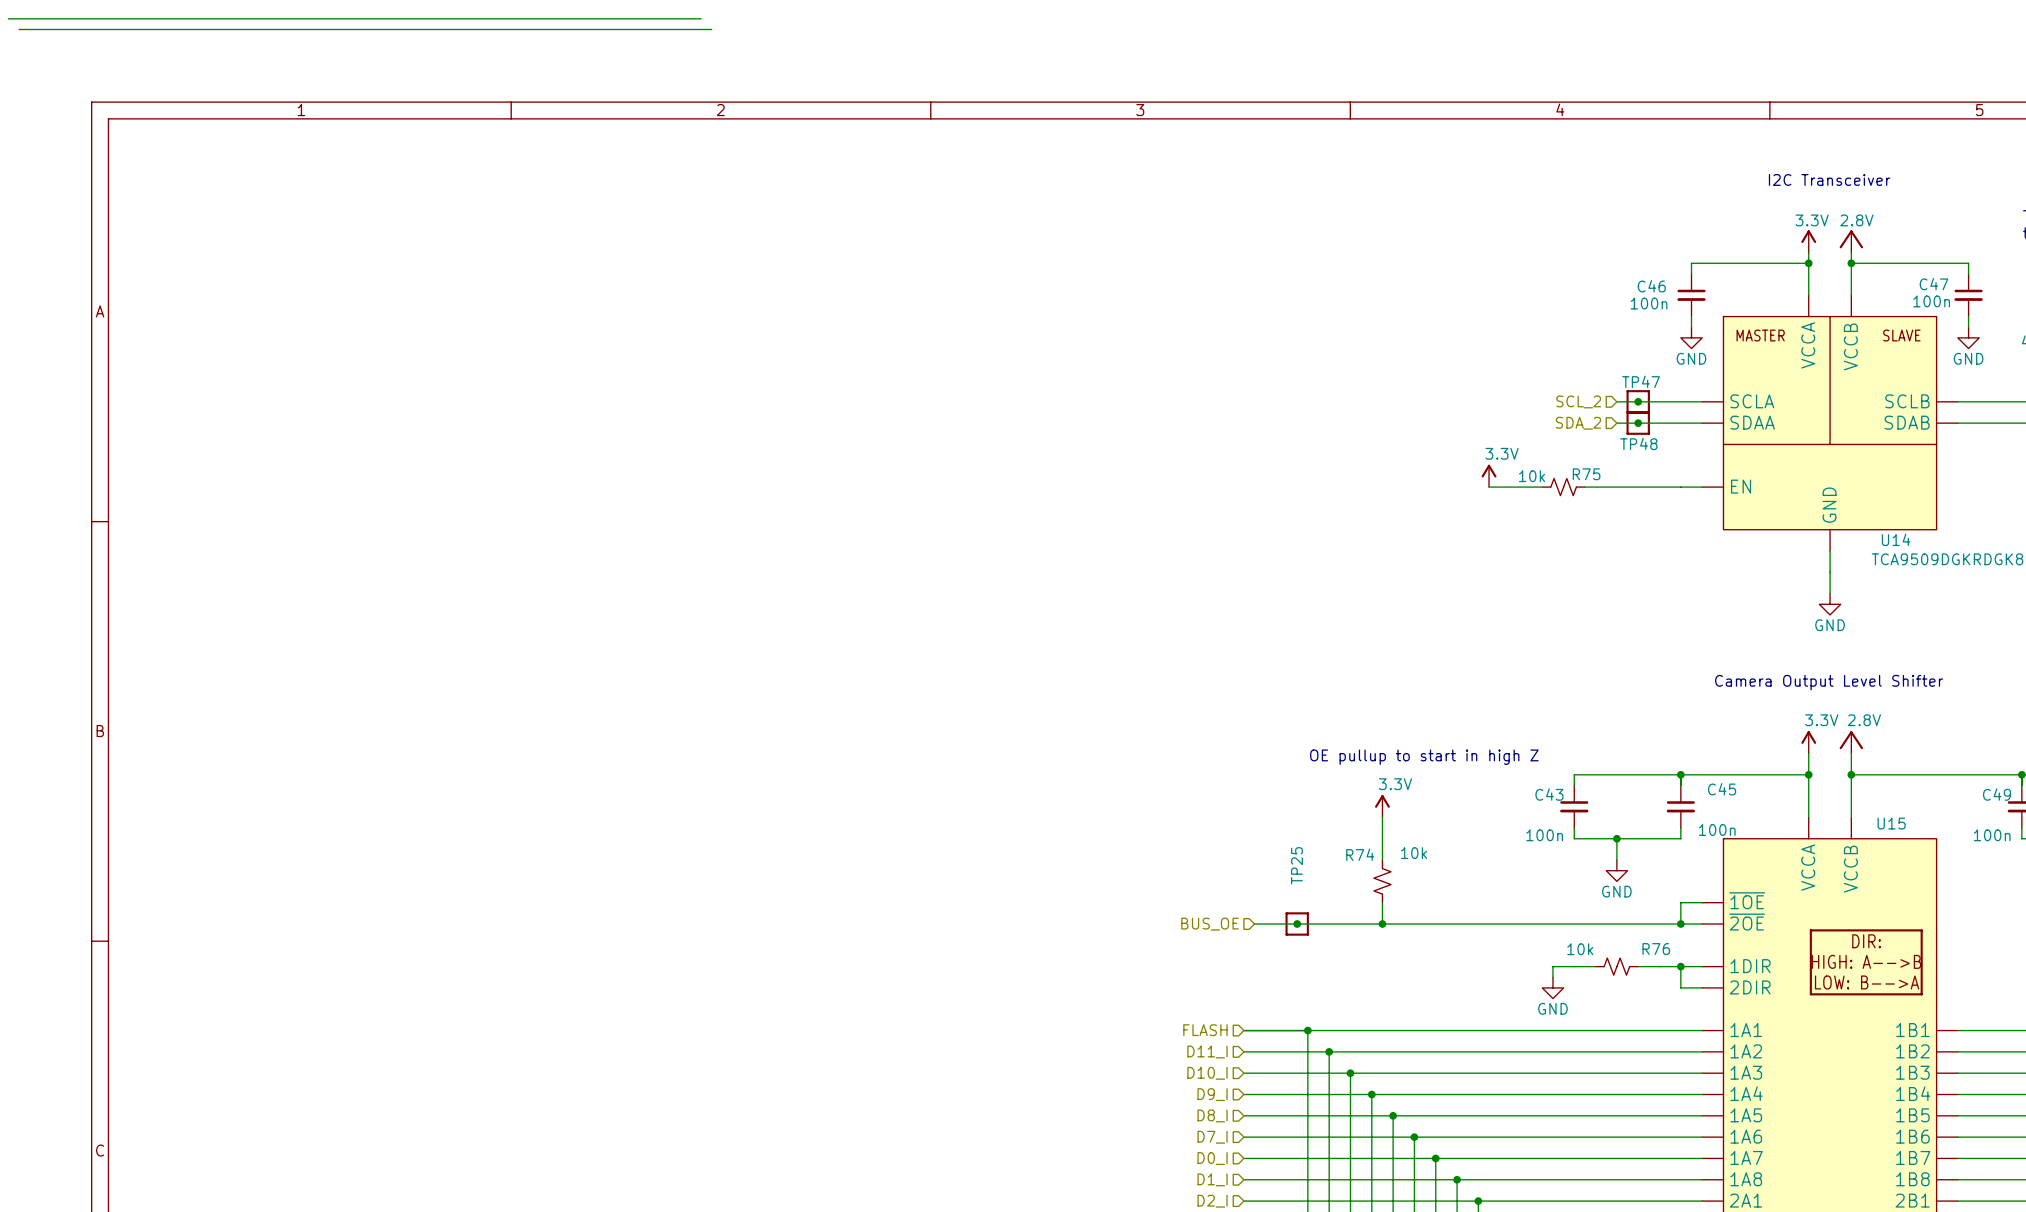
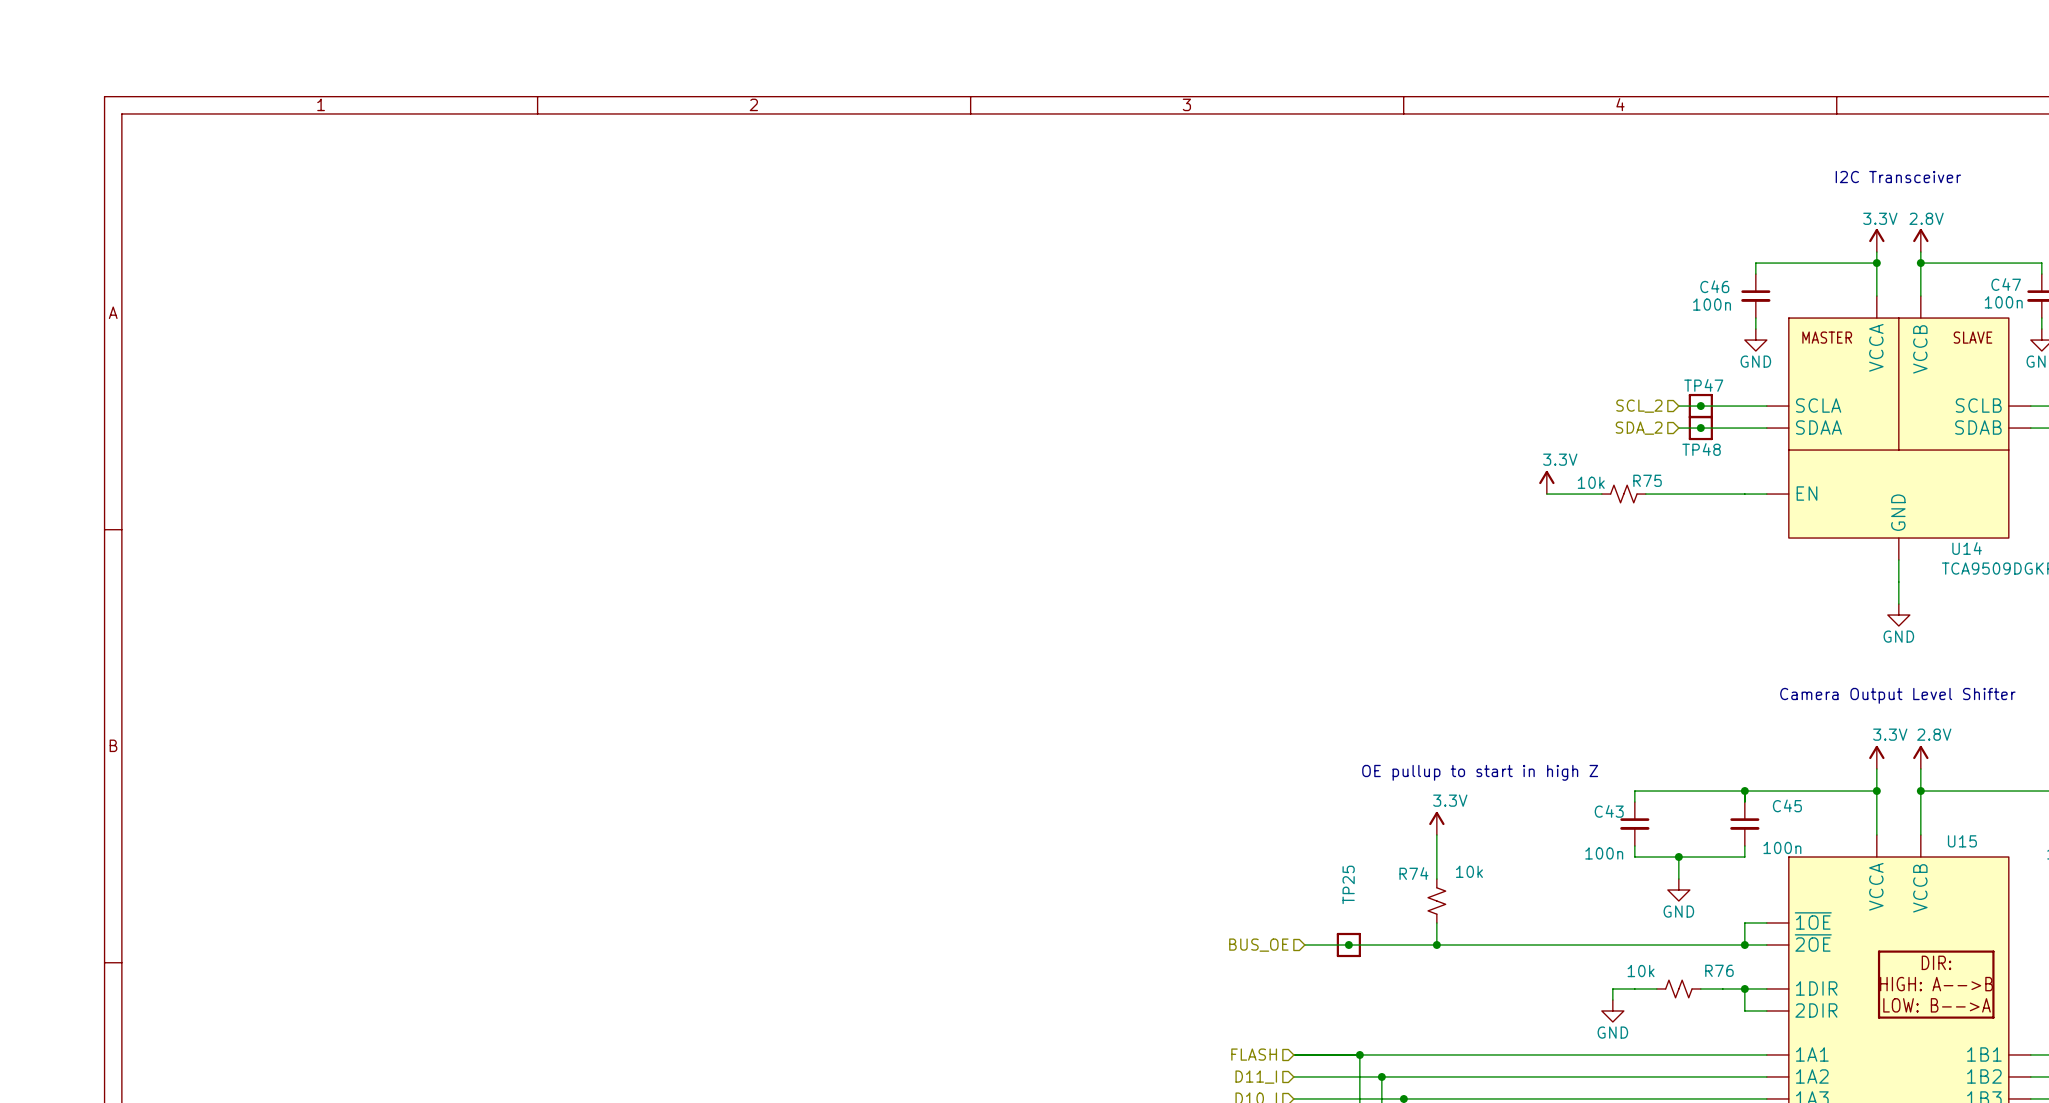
wire: (8, 18) (701, 18) -> none
wire: (19, 29) (711, 29) -> none
power symbol shape: [1839, 230, 1864, 253] -> [1913, 228, 1929, 253]
power symbol shape: [1839, 731, 1864, 754] -> [1913, 745, 1929, 770]

